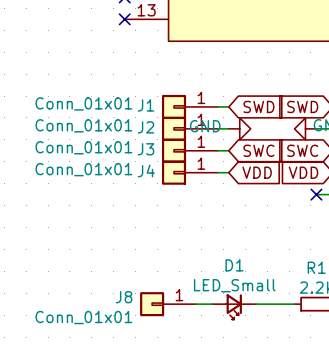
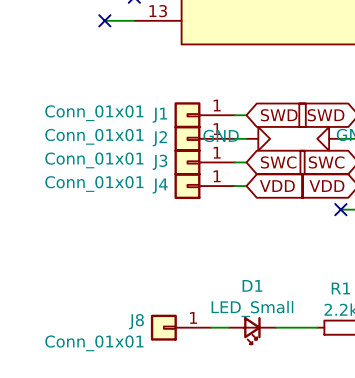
wire: none -> (104, 20) (134, 20)
no-connect mark: none -> (104, 20)
no-connect mark: (124, 19) -> none

